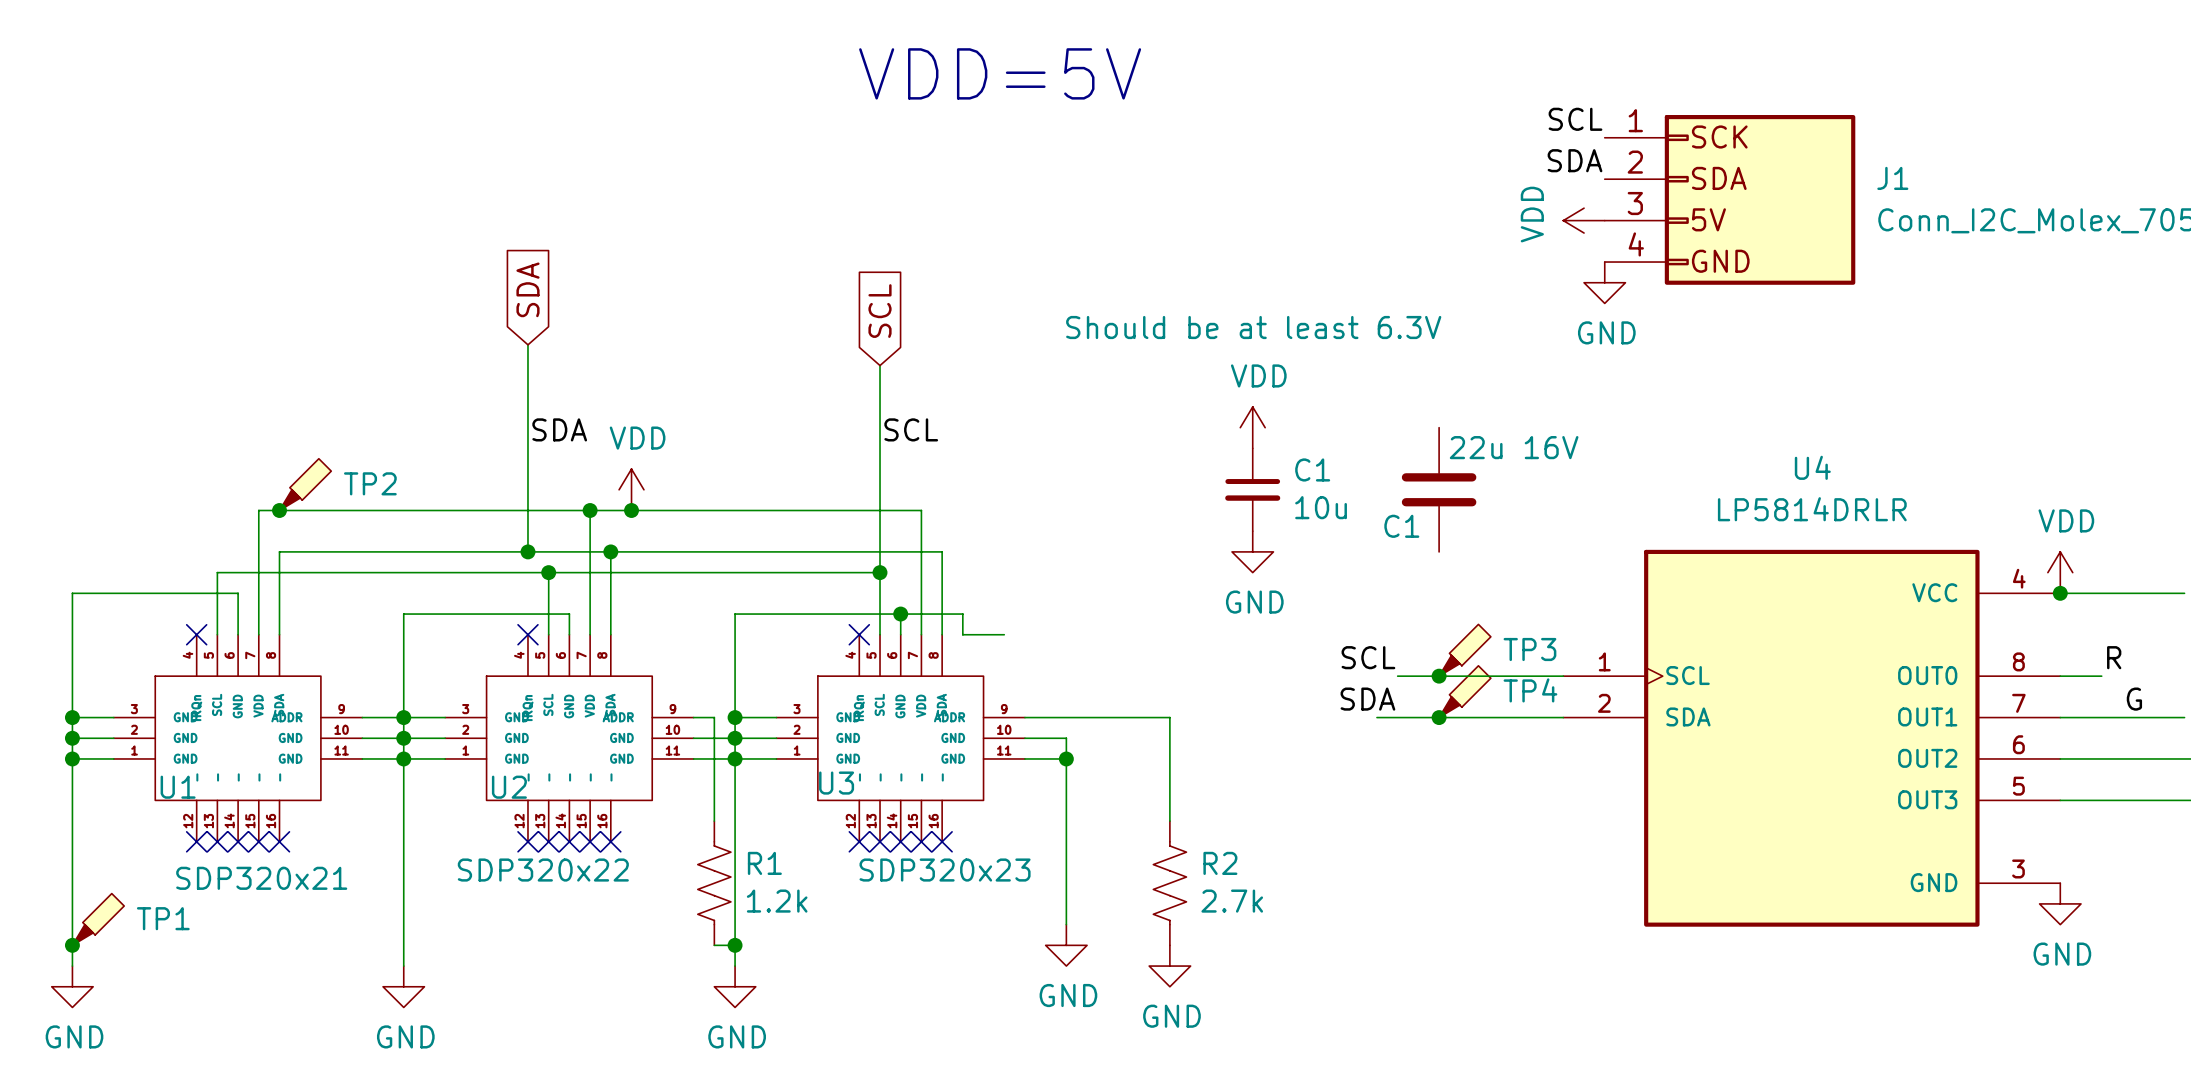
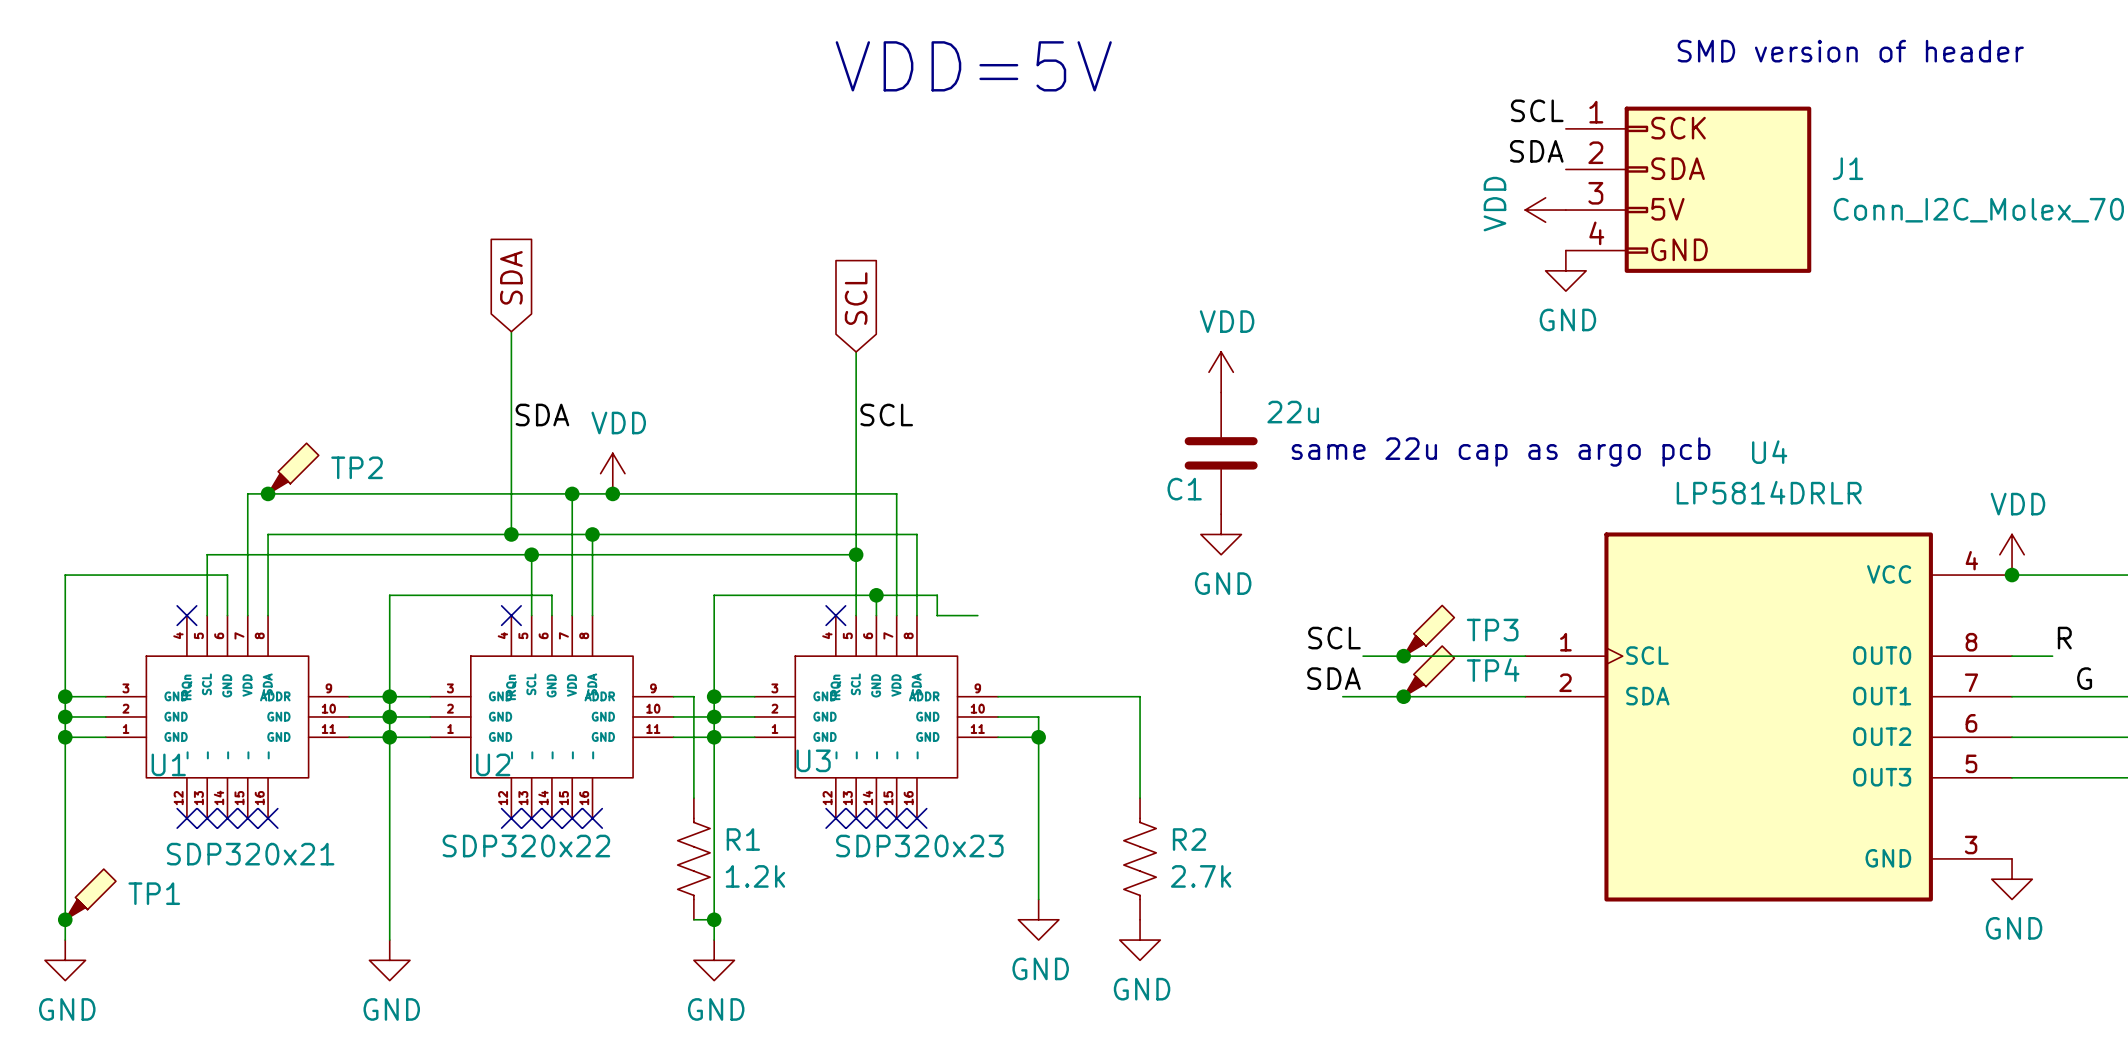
text: none -> SMD version of header (1850, 51)
power symbol position: VDD (1252, 427) -> VDD (1221, 372)
text: none -> same 22u cap as argo pcb (1501, 451)
C1: none -> 22u (1221, 453)
C1: 10u (1252, 489) -> none
C1: 22u 16V (1439, 489) -> none

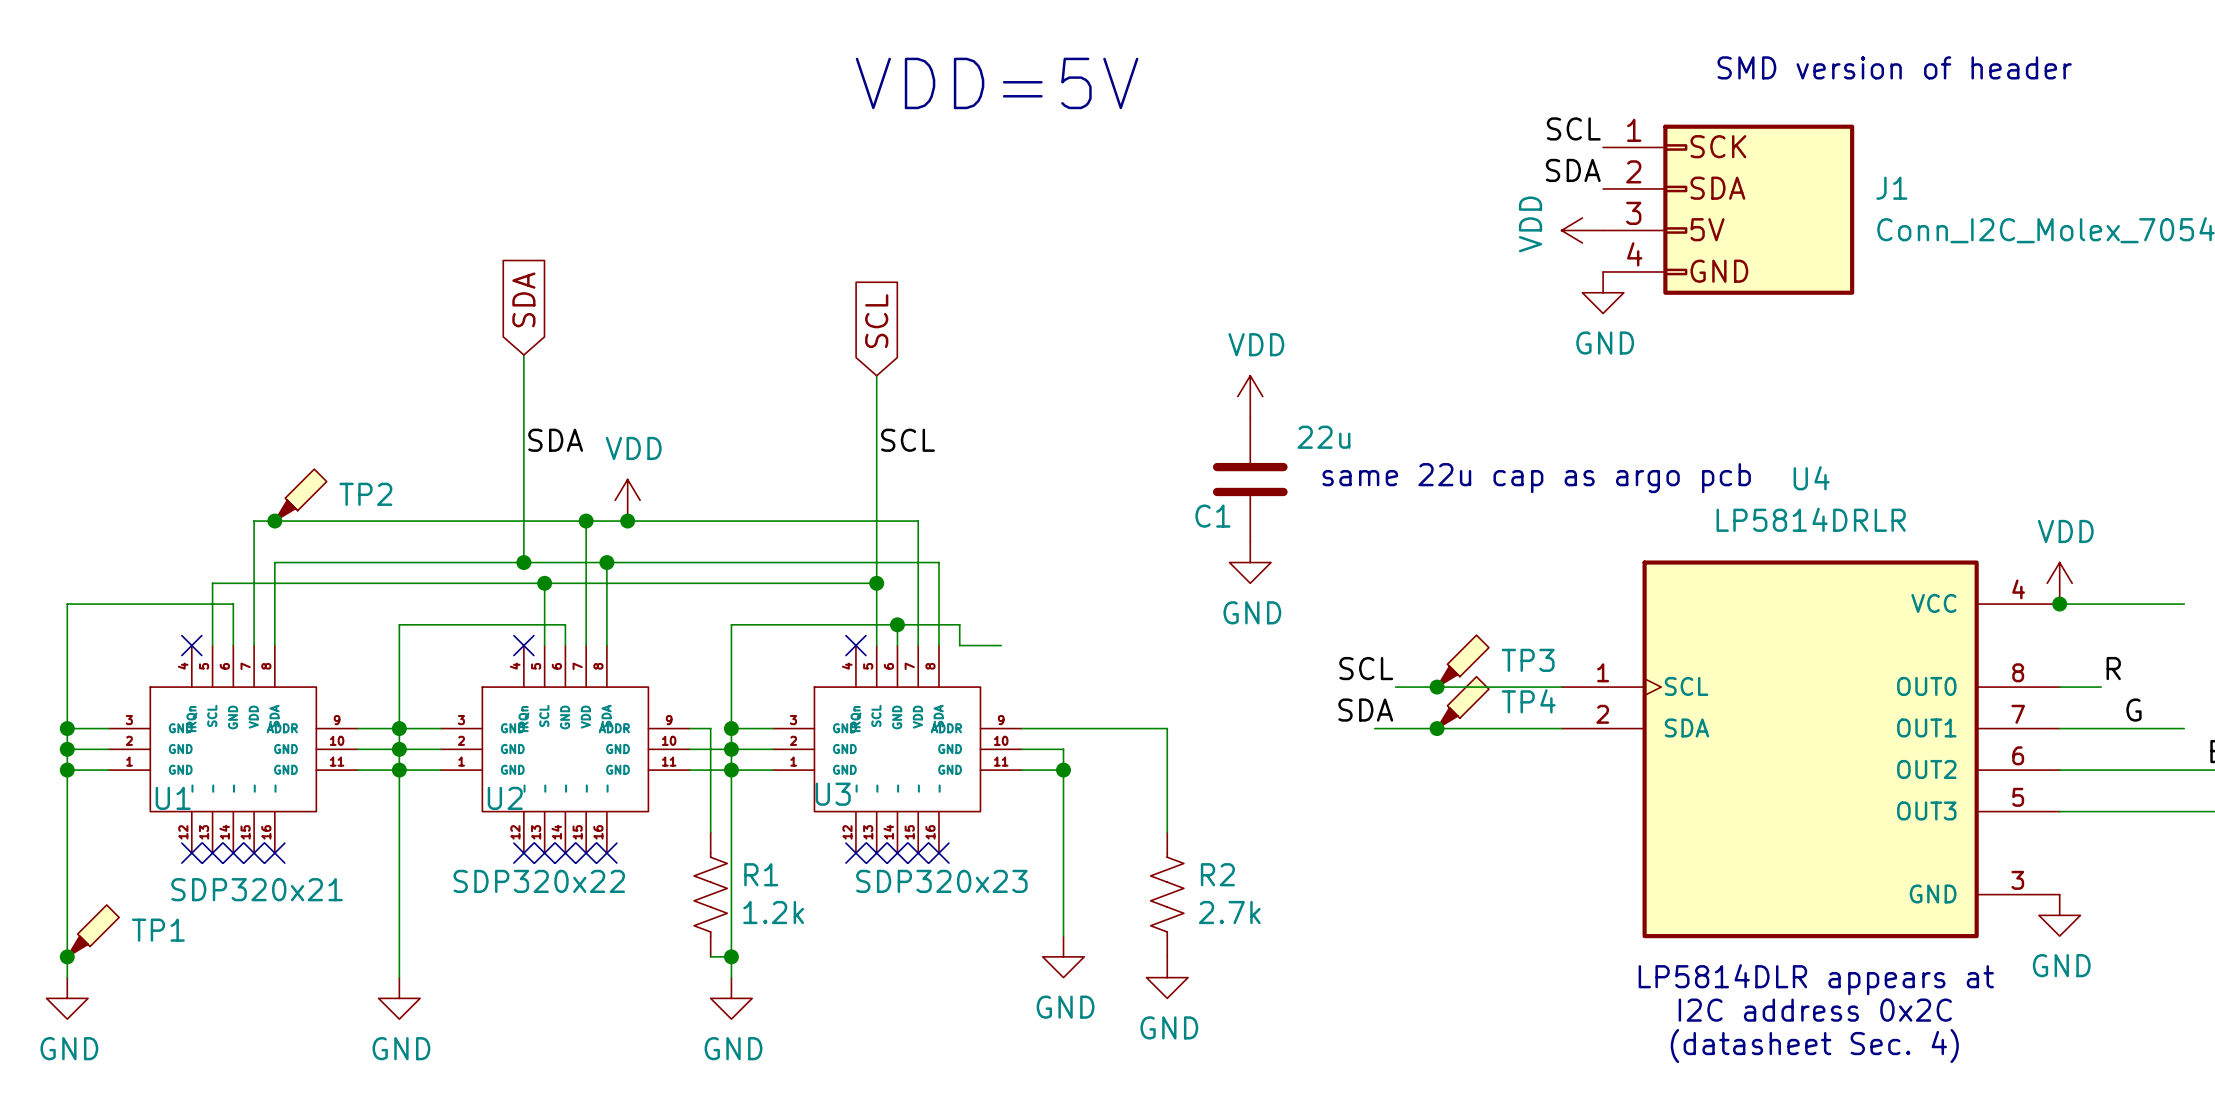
text: none -> LP5814DLR appears at (1816, 979)
text: none -> I2C address 0x2C (1815, 1010)
text: none -> (datasheet Sec. 4) (1814, 1046)

